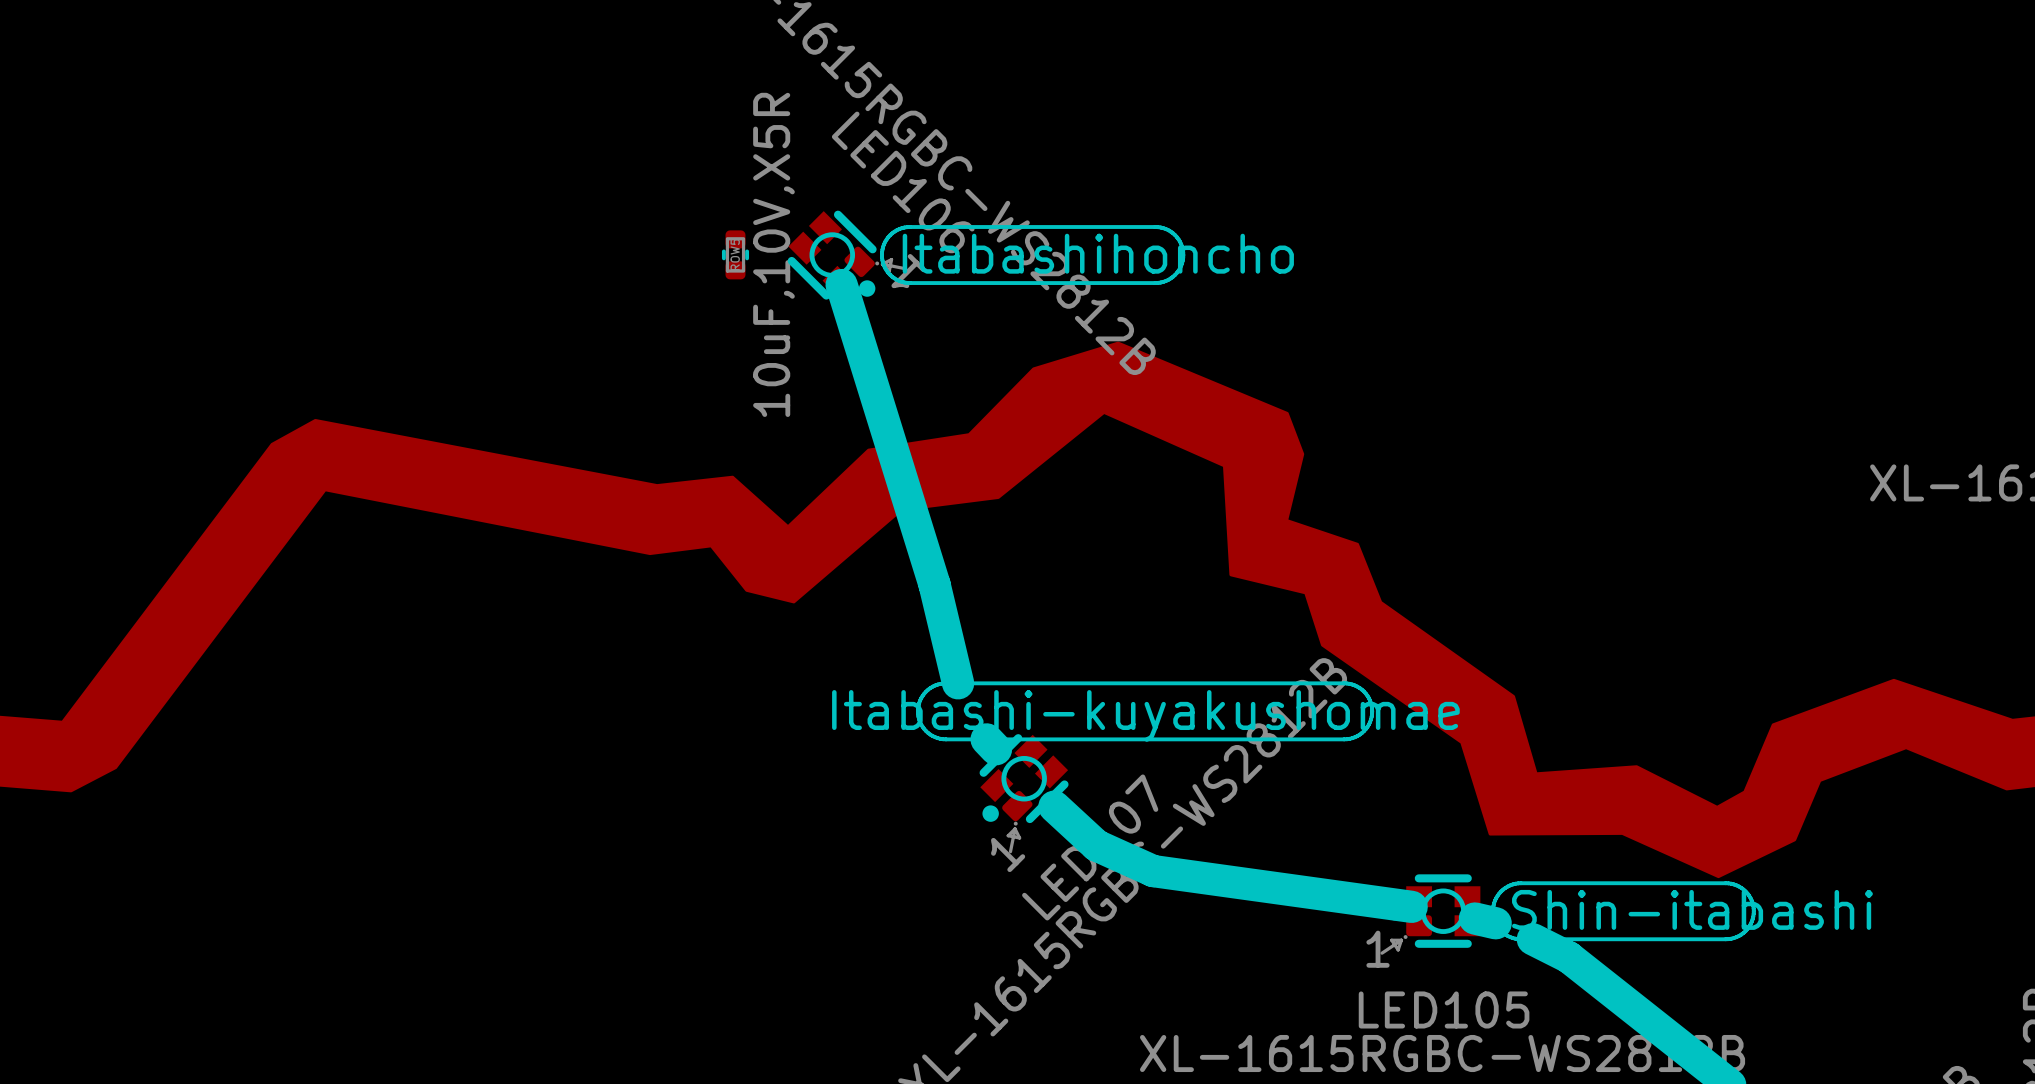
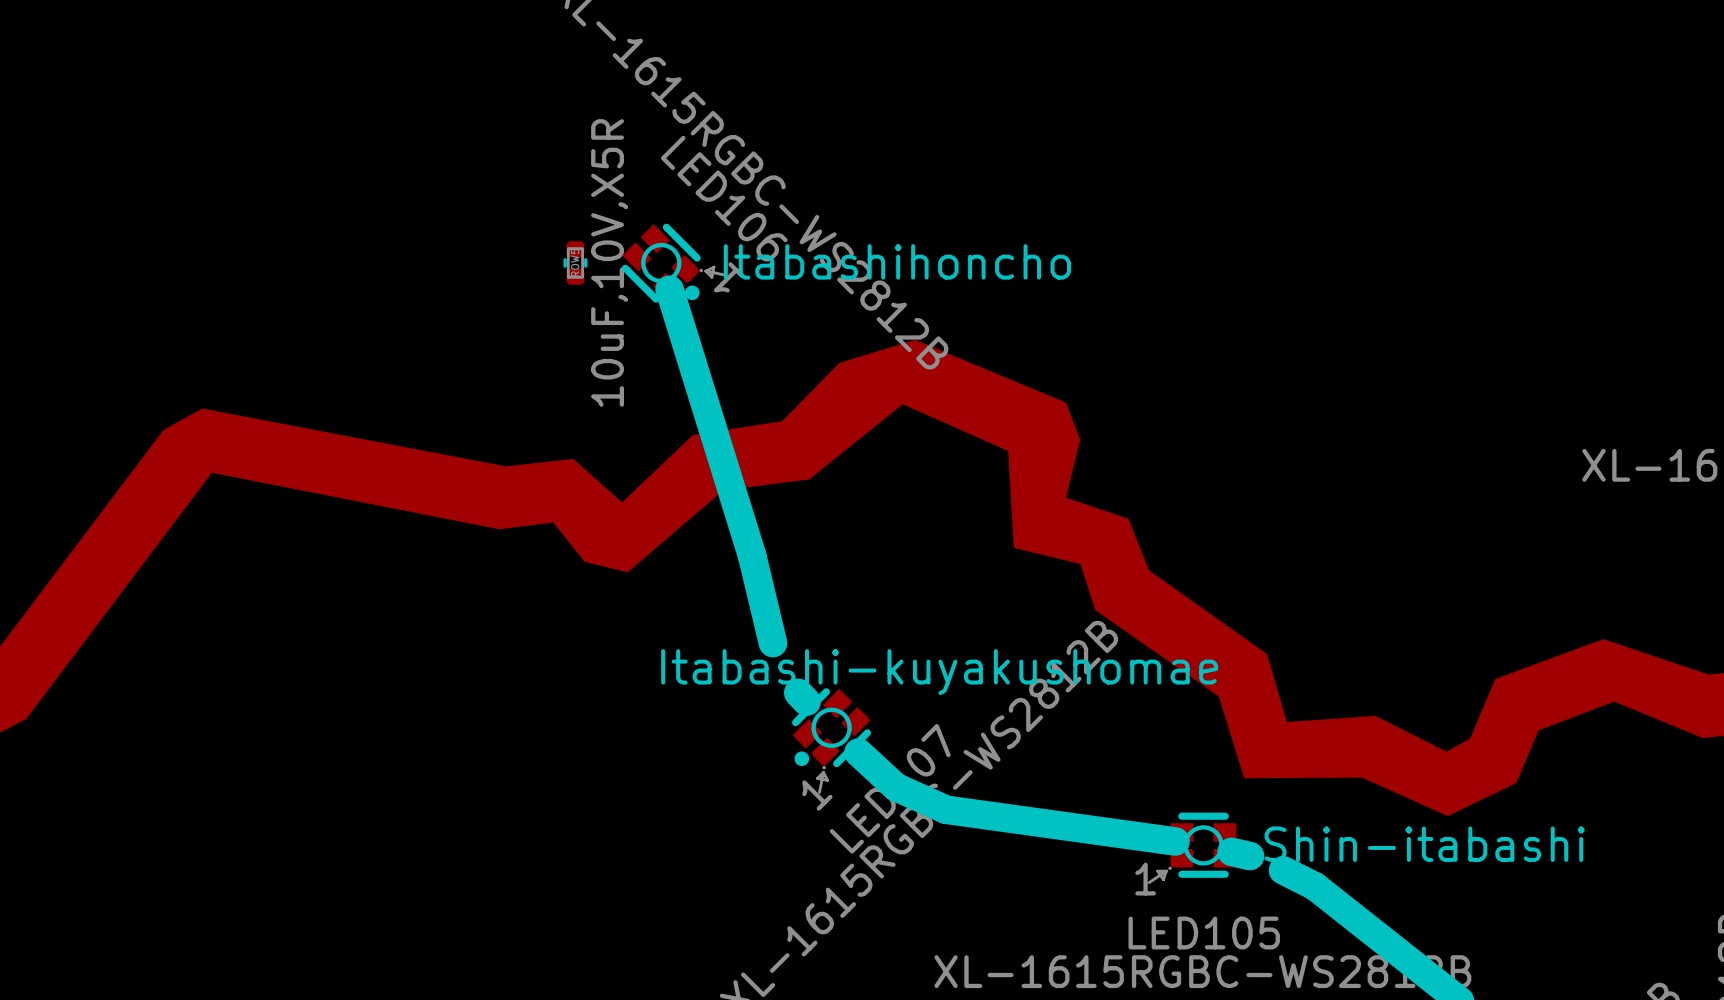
line: (907, 227) (1158, 227) (1168, 230) (1176, 237) (1182, 246) (1183, 257) (1180, 268) (1175, 274) (1168, 279) (1158, 282) (907, 282) (896, 279) (890, 274) (884, 265) (881, 255) (884, 244) (890, 235) (896, 230) (907, 227) -> none
line: (943, 683) (1346, 683) (1357, 686) (1365, 693) (1370, 703) (1372, 714) (1370, 722) (1363, 731) (1357, 736) (1346, 739) (943, 739) (932, 736) (926, 731) (920, 722) (917, 711) (920, 700) (926, 691) (932, 686) (943, 683) -> none
line: (1518, 883) (1728, 883) (1739, 886) (1747, 893) (1752, 903) (1753, 913) (1750, 924) (1745, 931) (1739, 935) (1728, 939) (1518, 939) (1507, 935) (1501, 931) (1495, 921) (1492, 911) (1495, 900) (1501, 891) (1507, 886) (1518, 883) -> none

